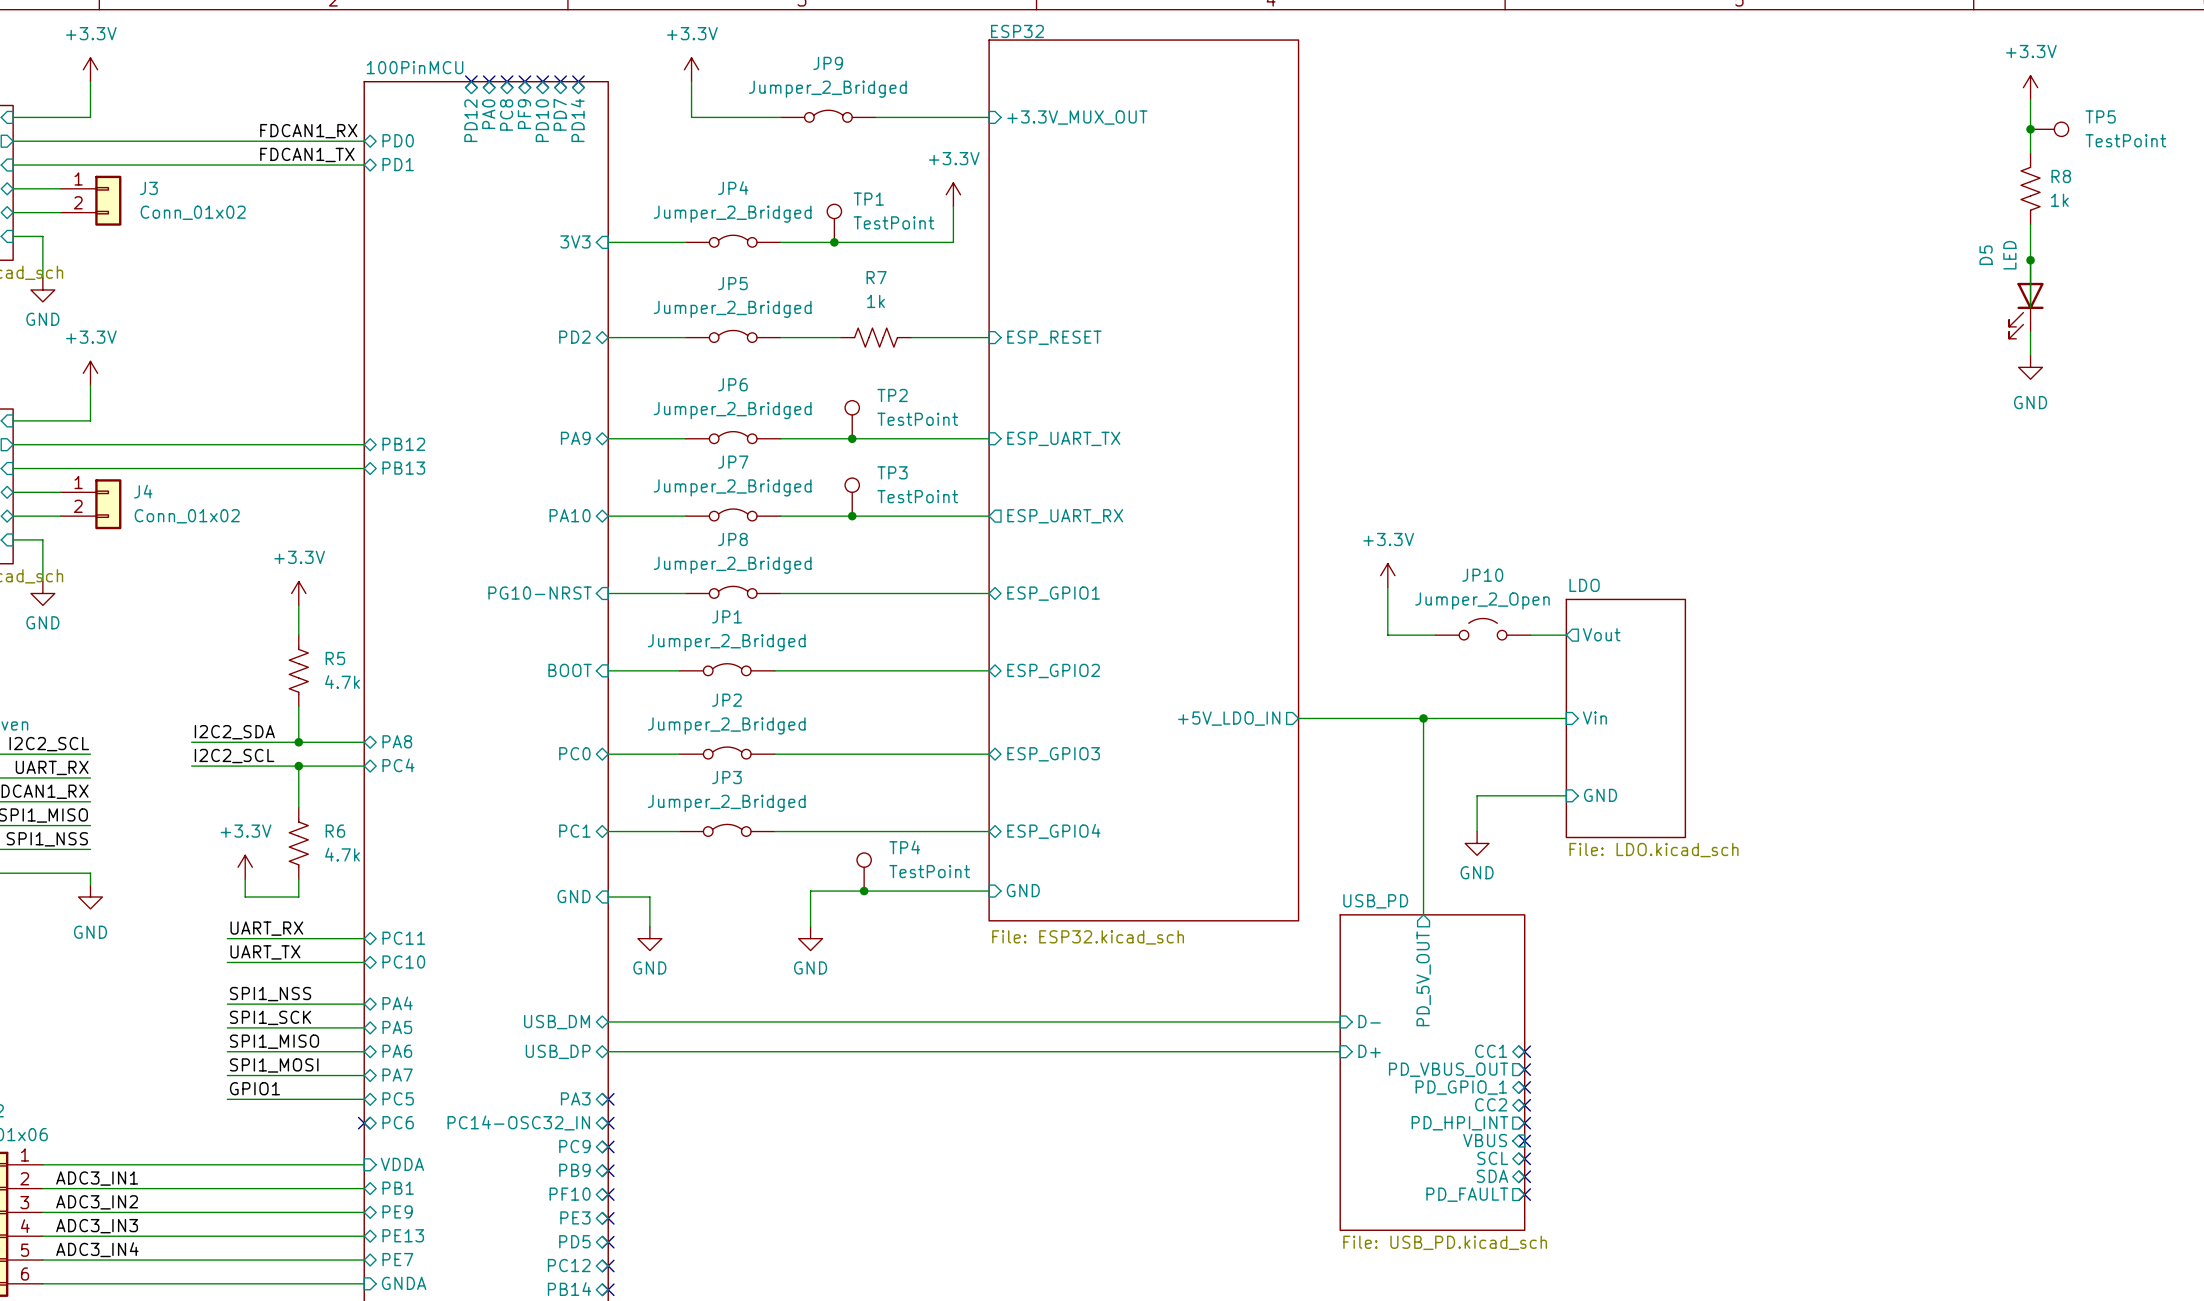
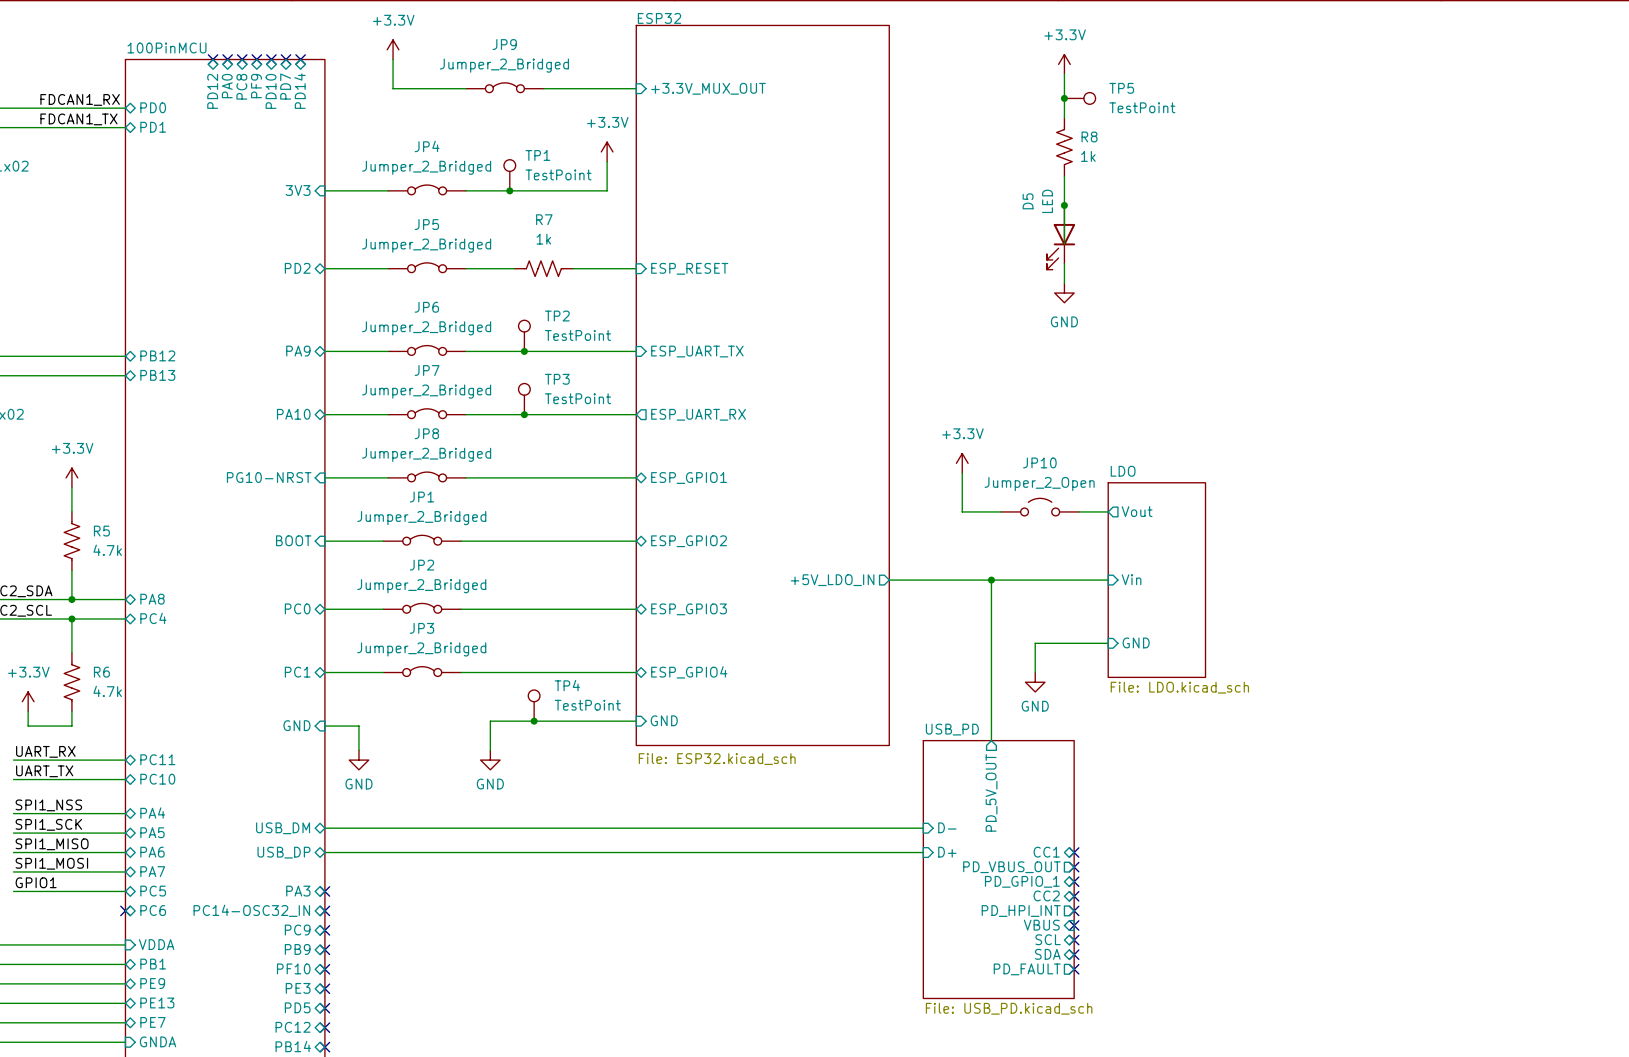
power symbol: none -> +3.3V (1064, 64)
power symbol: +3.3V (2030, 87) -> none
wire: none -> (1064, 74) (1064, 117)
wire: (2030, 99) (2030, 153) -> none
junction: none -> (1064, 98)
junction: (2030, 129) -> none
TP5 position: (2049, 129) -> (1079, 98)
R8 position: (2030, 188) -> (1064, 147)
wire: none -> (1064, 176) (1064, 244)
wire: (2030, 224) (2030, 307) -> none
junction: none -> (1064, 205)
junction: (2030, 260) -> none
D5 position: (2026, 299) -> (1061, 237)
wire: none -> (1064, 263) (1064, 283)
wire: (2030, 331) (2030, 355) -> none
power symbol: none -> GND (1064, 293)
power symbol: GND (2030, 367) -> none

